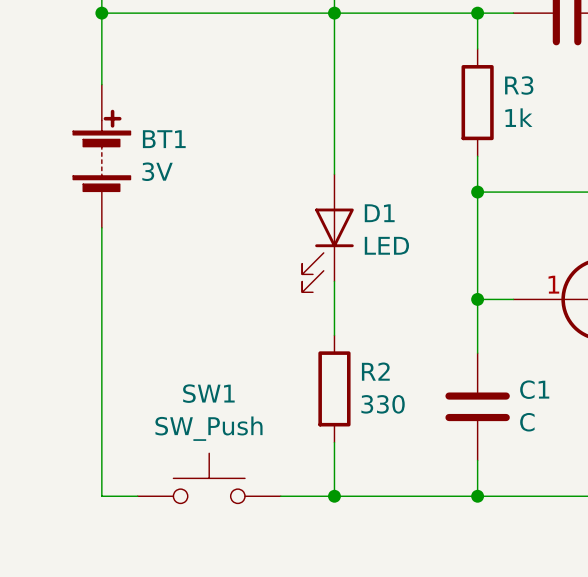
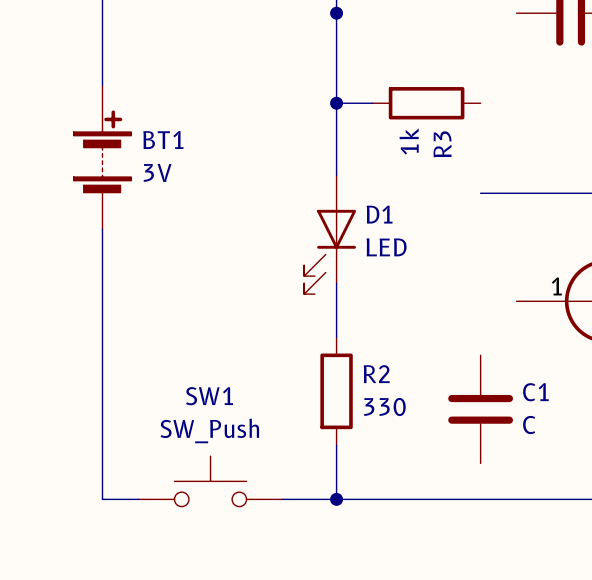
wire: (101, 13) (513, 13) -> none
junction: (101, 13) -> none
wire: (477, 13) (477, 48) -> none
junction: (477, 13) -> none
junction: none -> (336, 103)
R3 rotation: 0° (477, 102) -> 90° clockwise (426, 103)
wire: (477, 156) (477, 353) -> none
junction: (477, 192) -> none
wire: (477, 299) (513, 299) -> (336, 103) (372, 103)
junction: (477, 299) -> none
wire: (477, 460) (477, 496) -> none
junction: (477, 496) -> none

